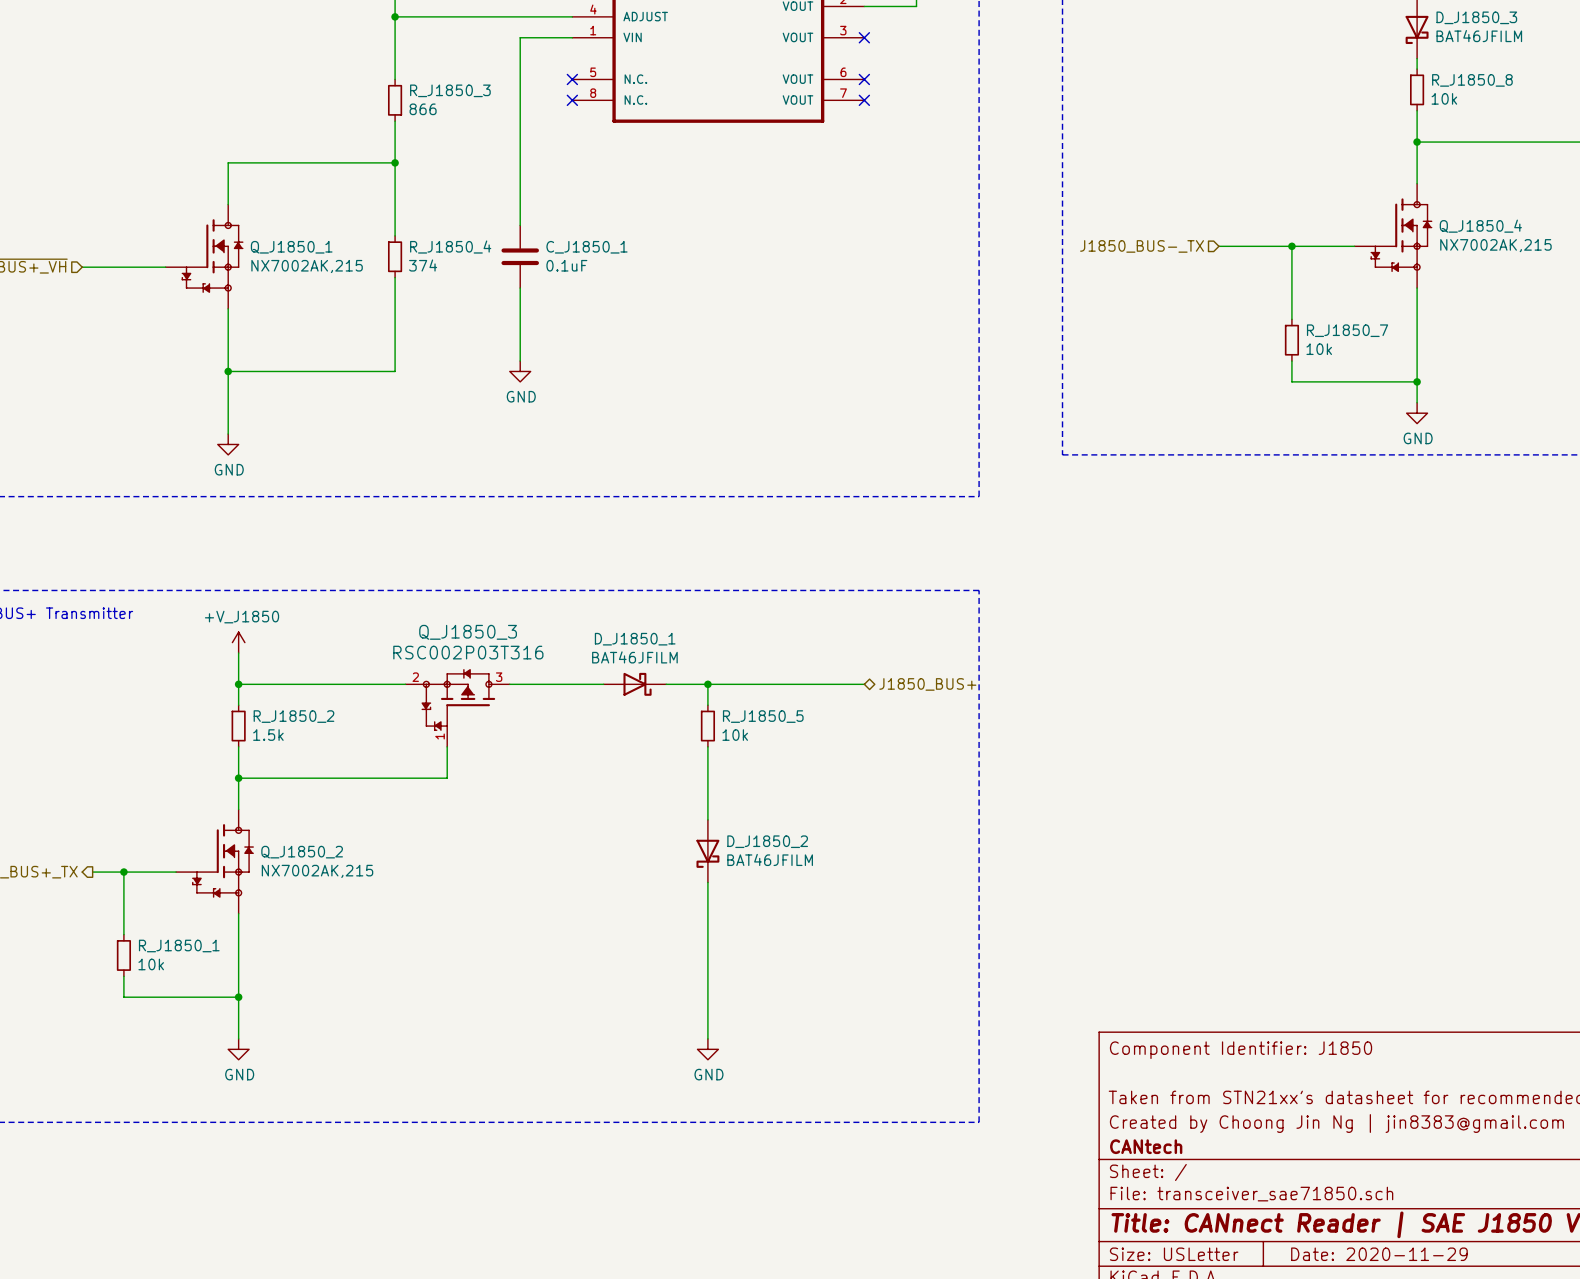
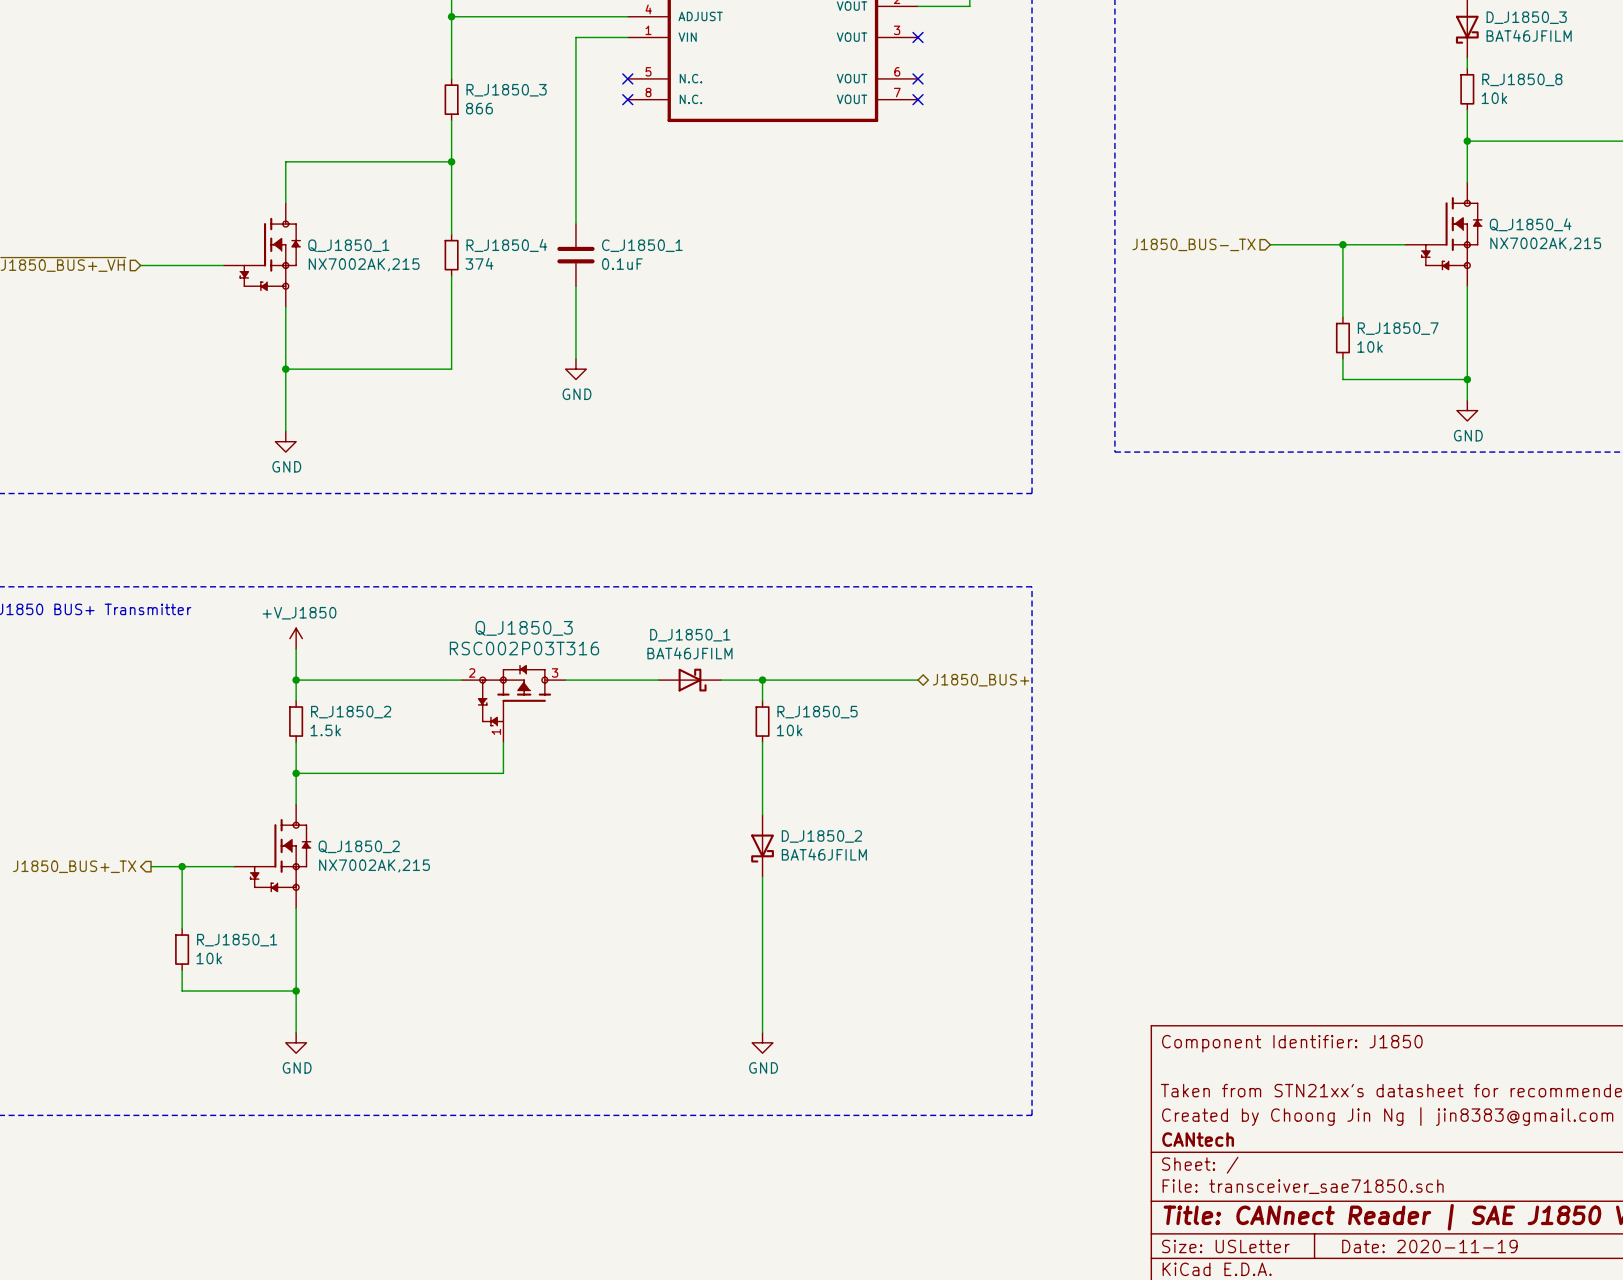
title block: Date: 2020-11-29 (1379, 1254) -> Date: 2020-11-19 (1429, 1246)

